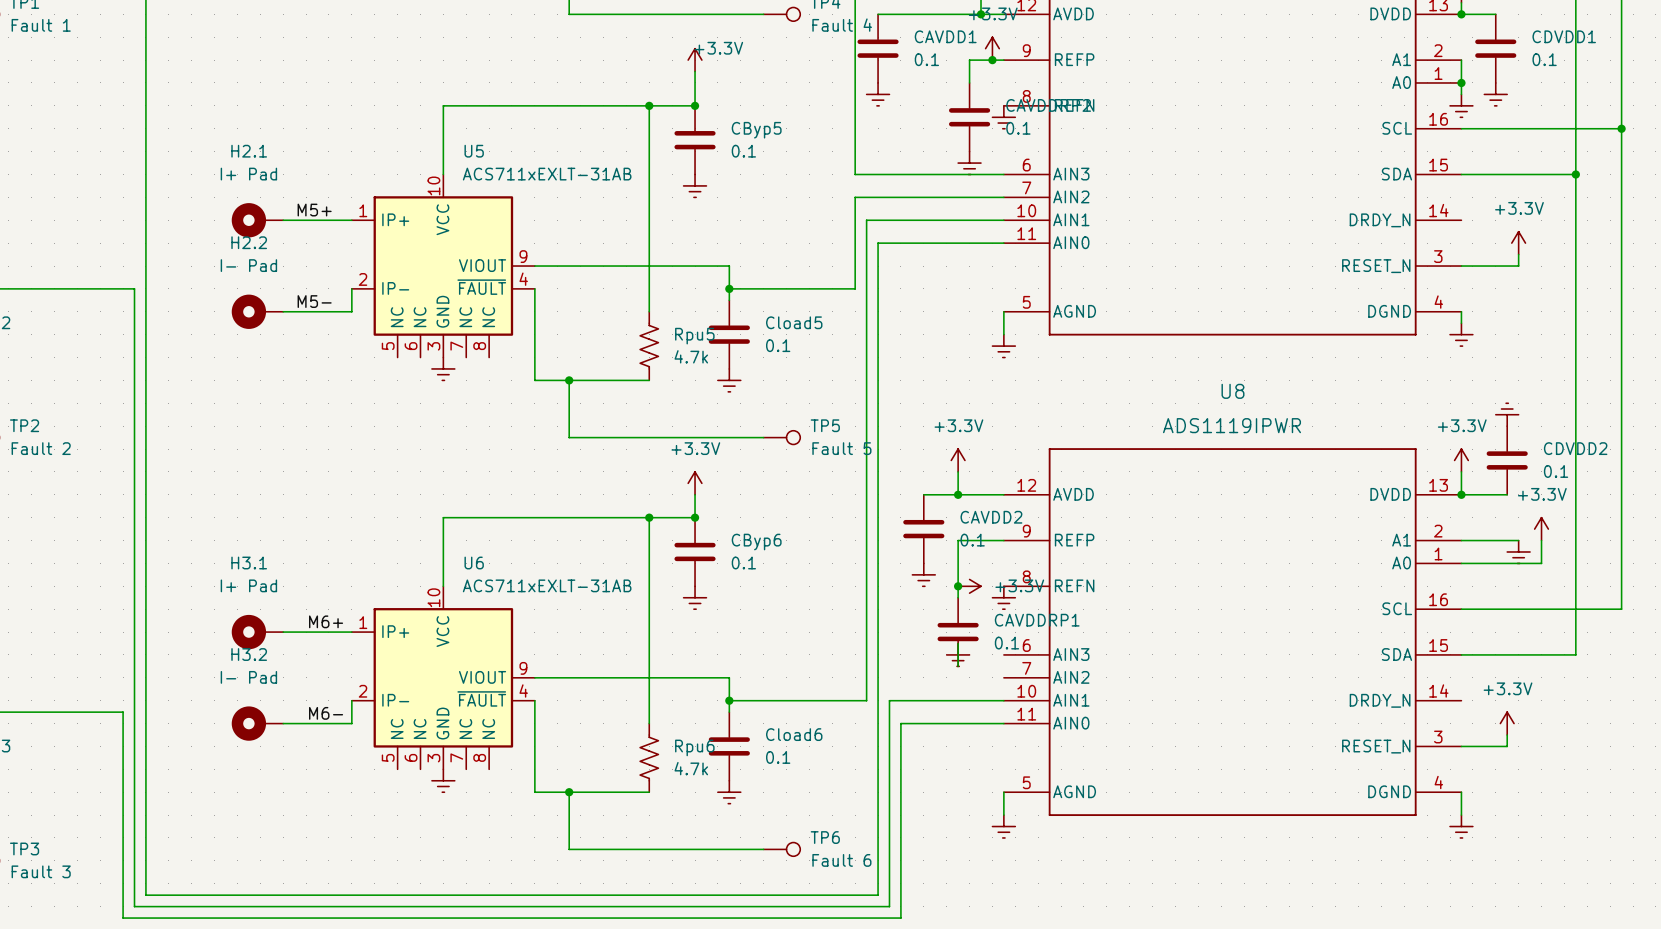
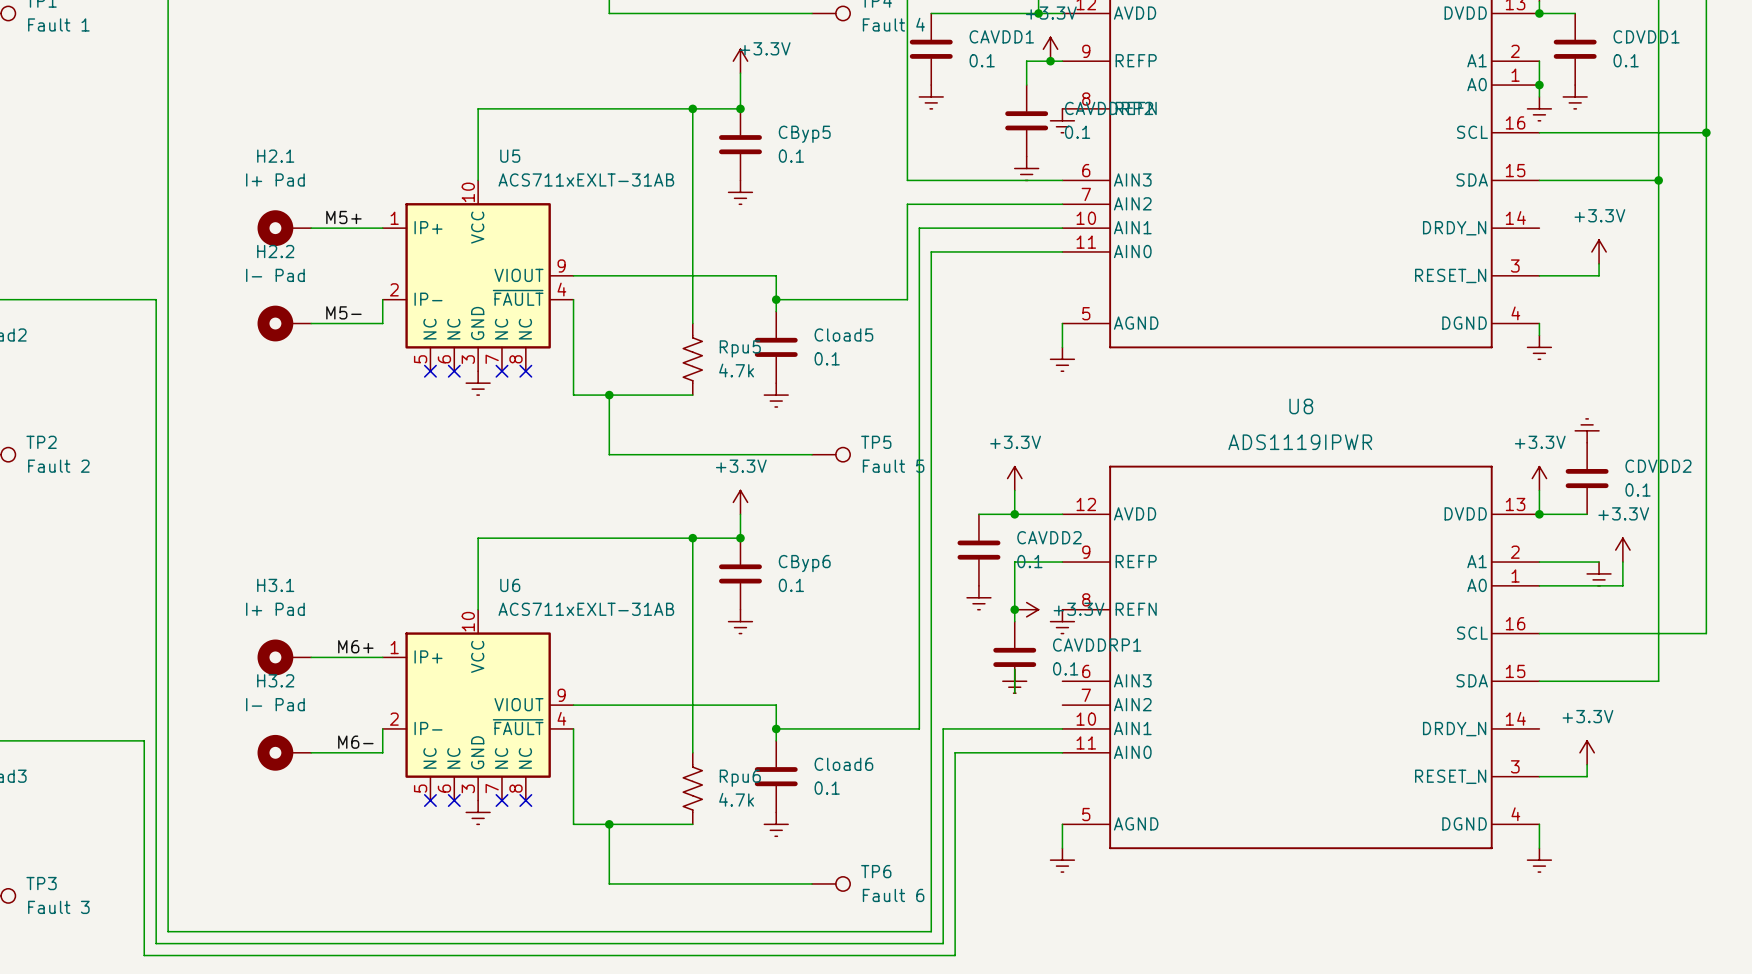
no-connect mark: none -> (430, 371)
no-connect mark: none -> (454, 371)
no-connect mark: none -> (501, 371)
no-connect mark: none -> (525, 371)
no-connect mark: none -> (430, 800)
no-connect mark: none -> (454, 800)
no-connect mark: none -> (501, 800)
no-connect mark: none -> (525, 800)

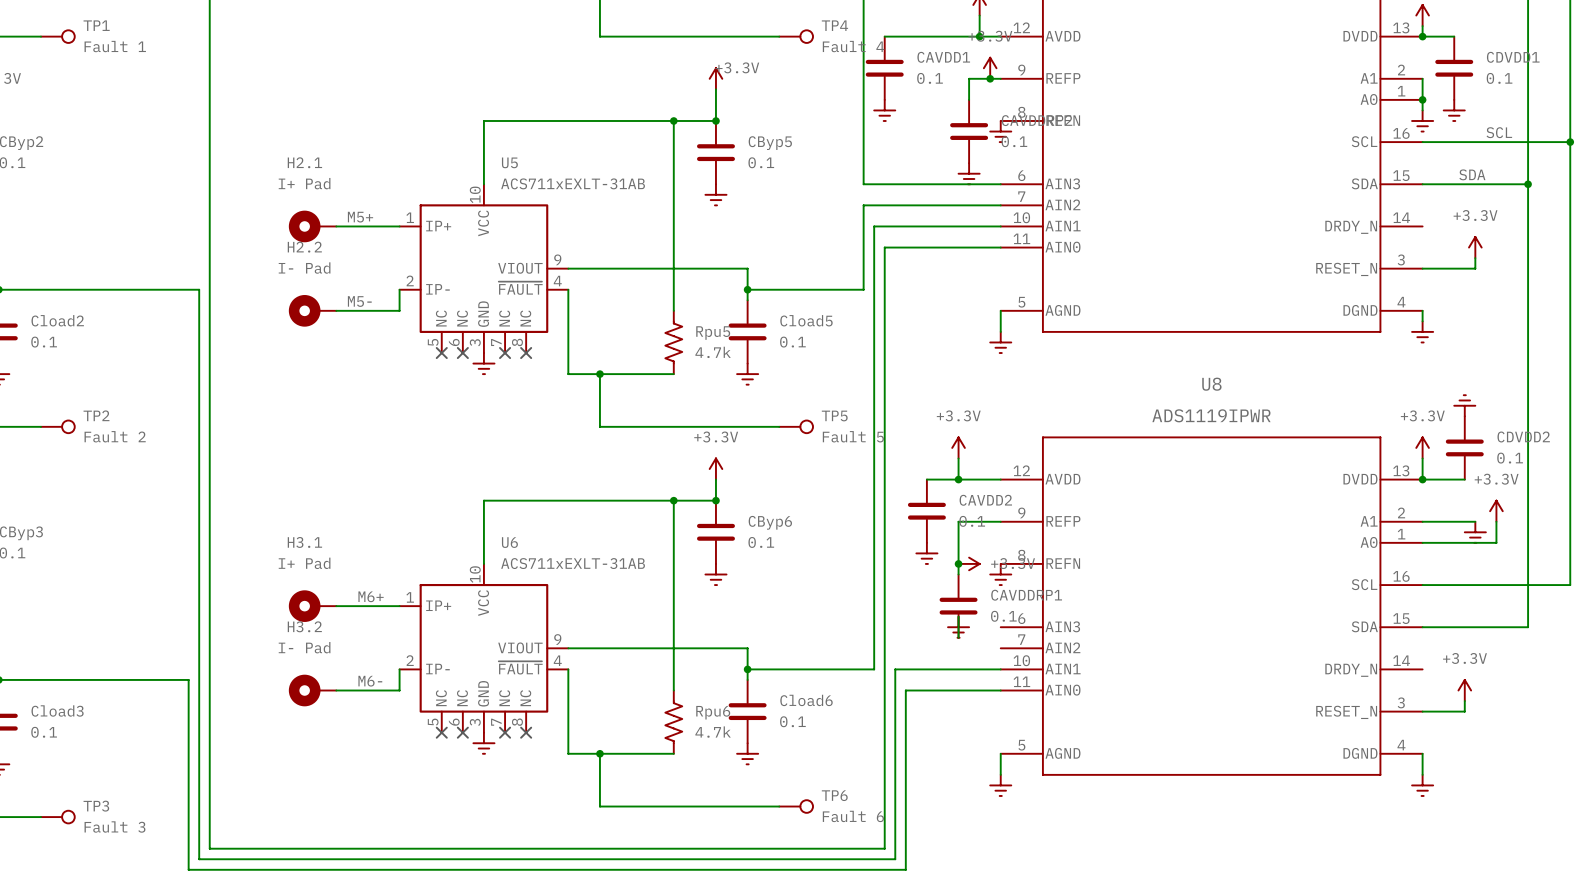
label: none -> SCL (1499, 132)
label: none -> SDA (1472, 174)

